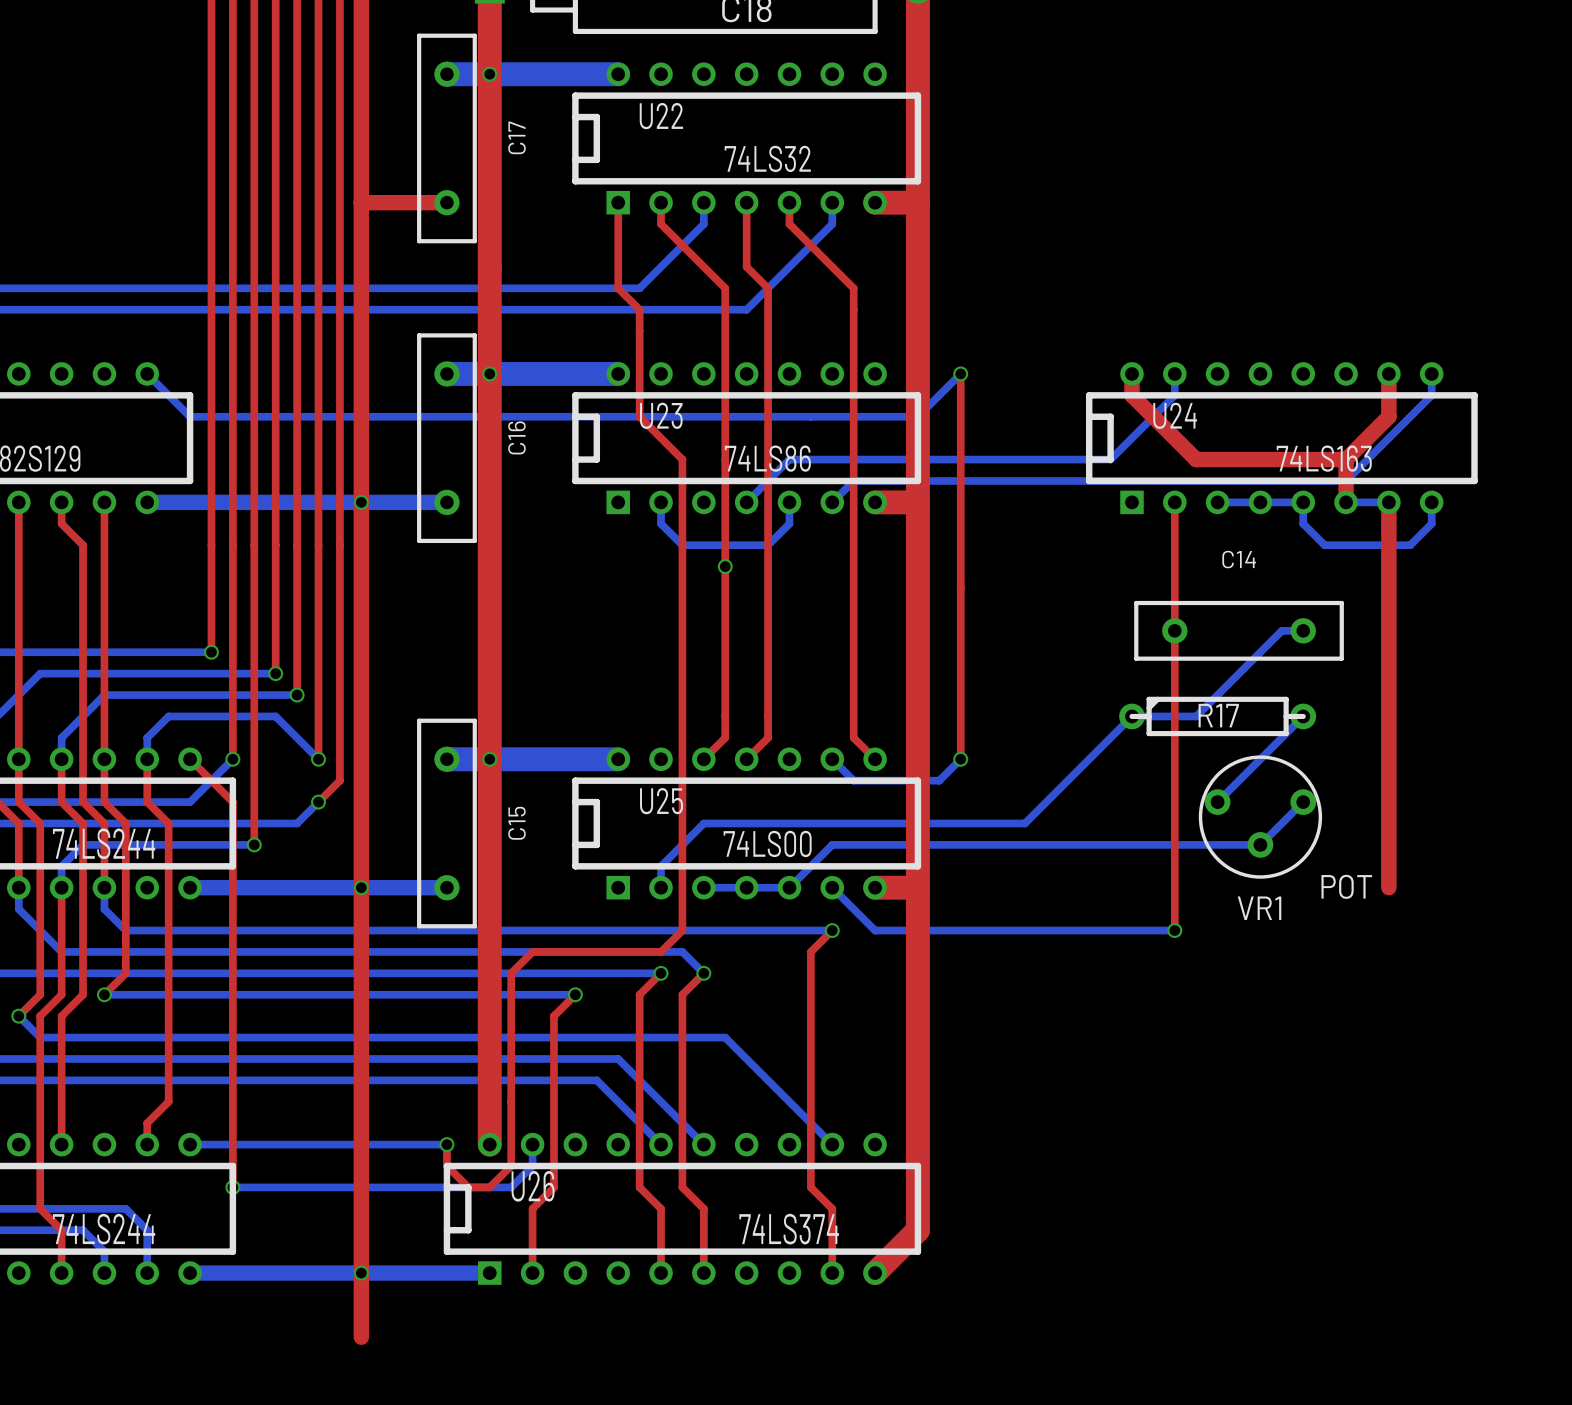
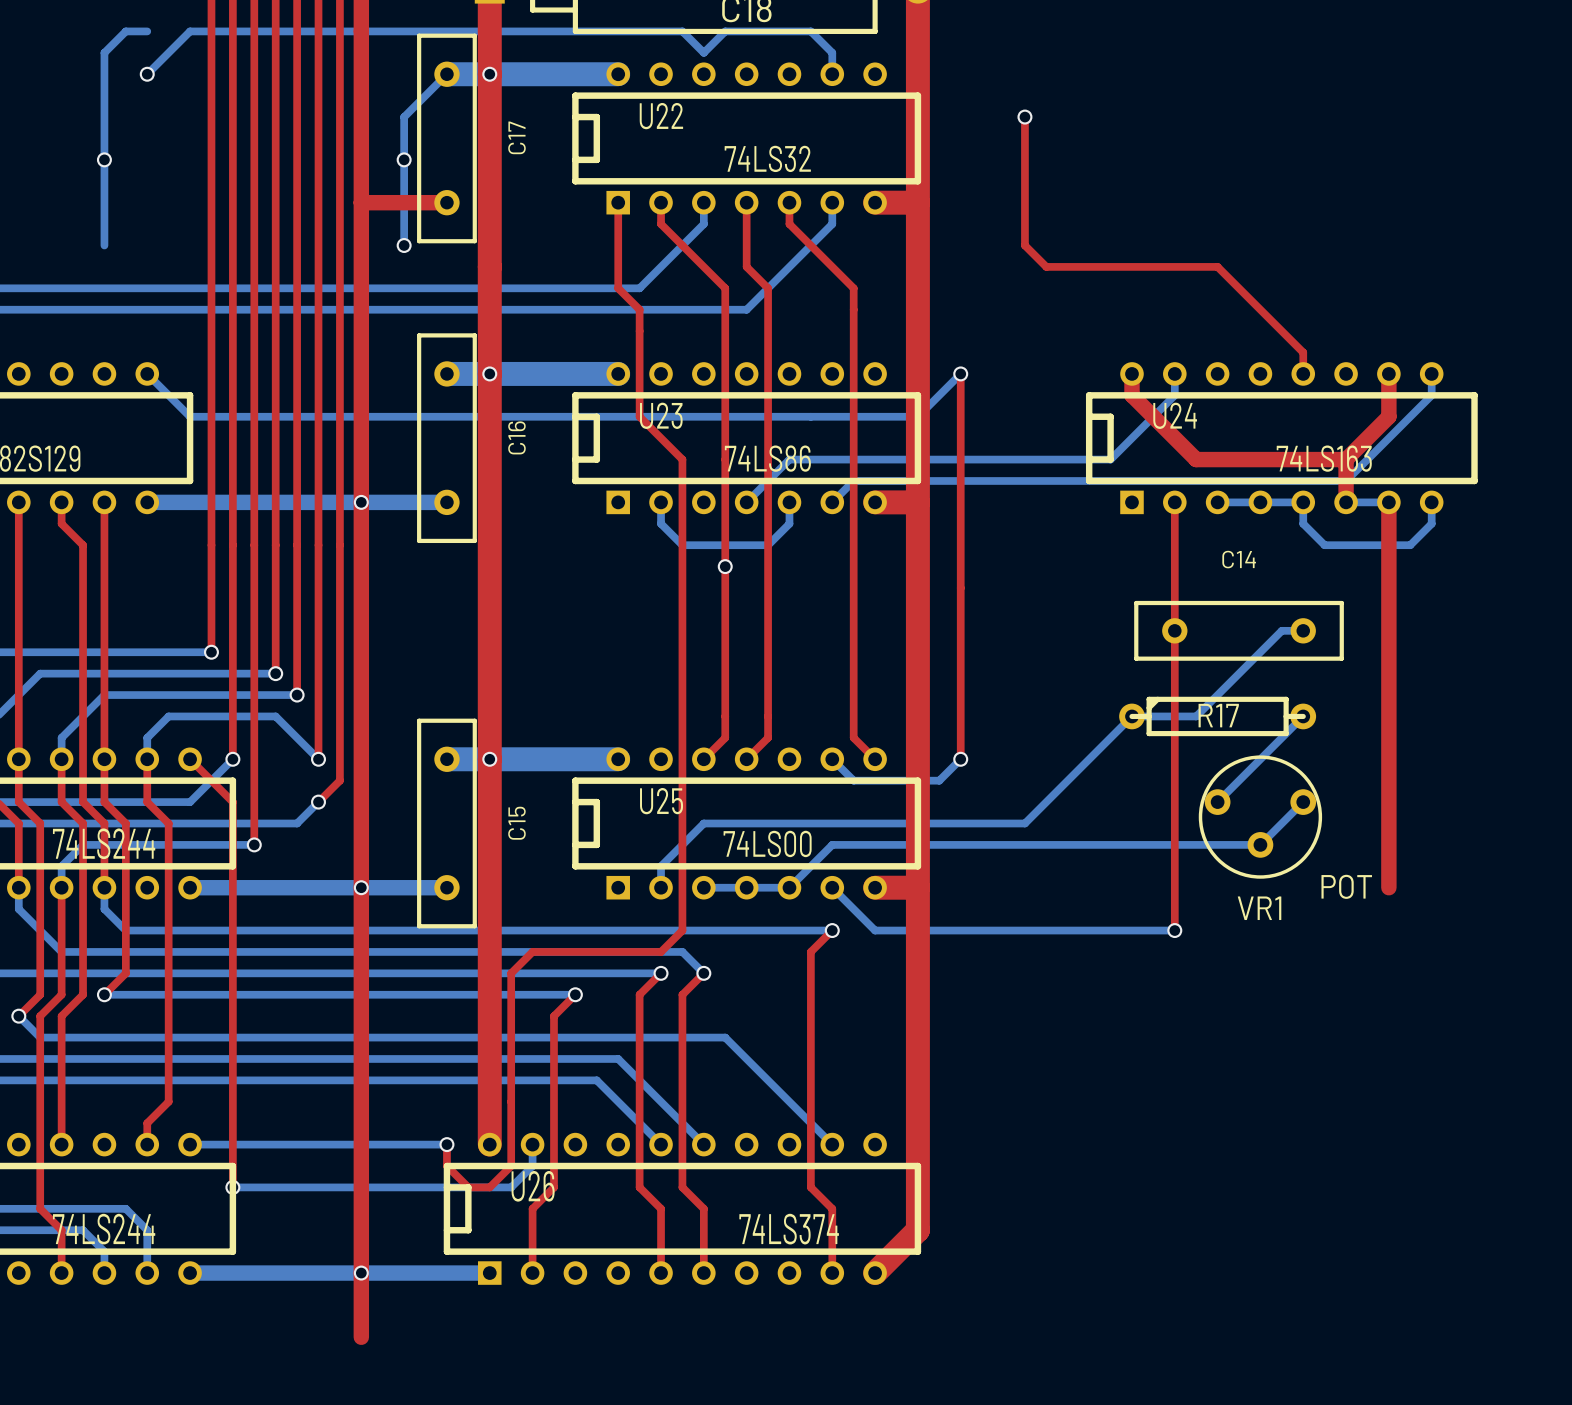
bottom track: none -> (147, 31) (125, 31) (104, 52) (104, 245)
bottom track: none -> (147, 74) (190, 31) (682, 31) (703, 52) (725, 31) (810, 31) (832, 52) (832, 74)
via: none -> (147, 74)
bottom track: none -> (446, 74) (404, 117) (404, 245)
top track: none -> (1024, 117) (1024, 245) (1046, 266) (1217, 266) (1303, 352) (1303, 373)
via: none -> (1024, 117)
via: none -> (104, 159)
via: none -> (404, 159)
via: none -> (404, 245)

